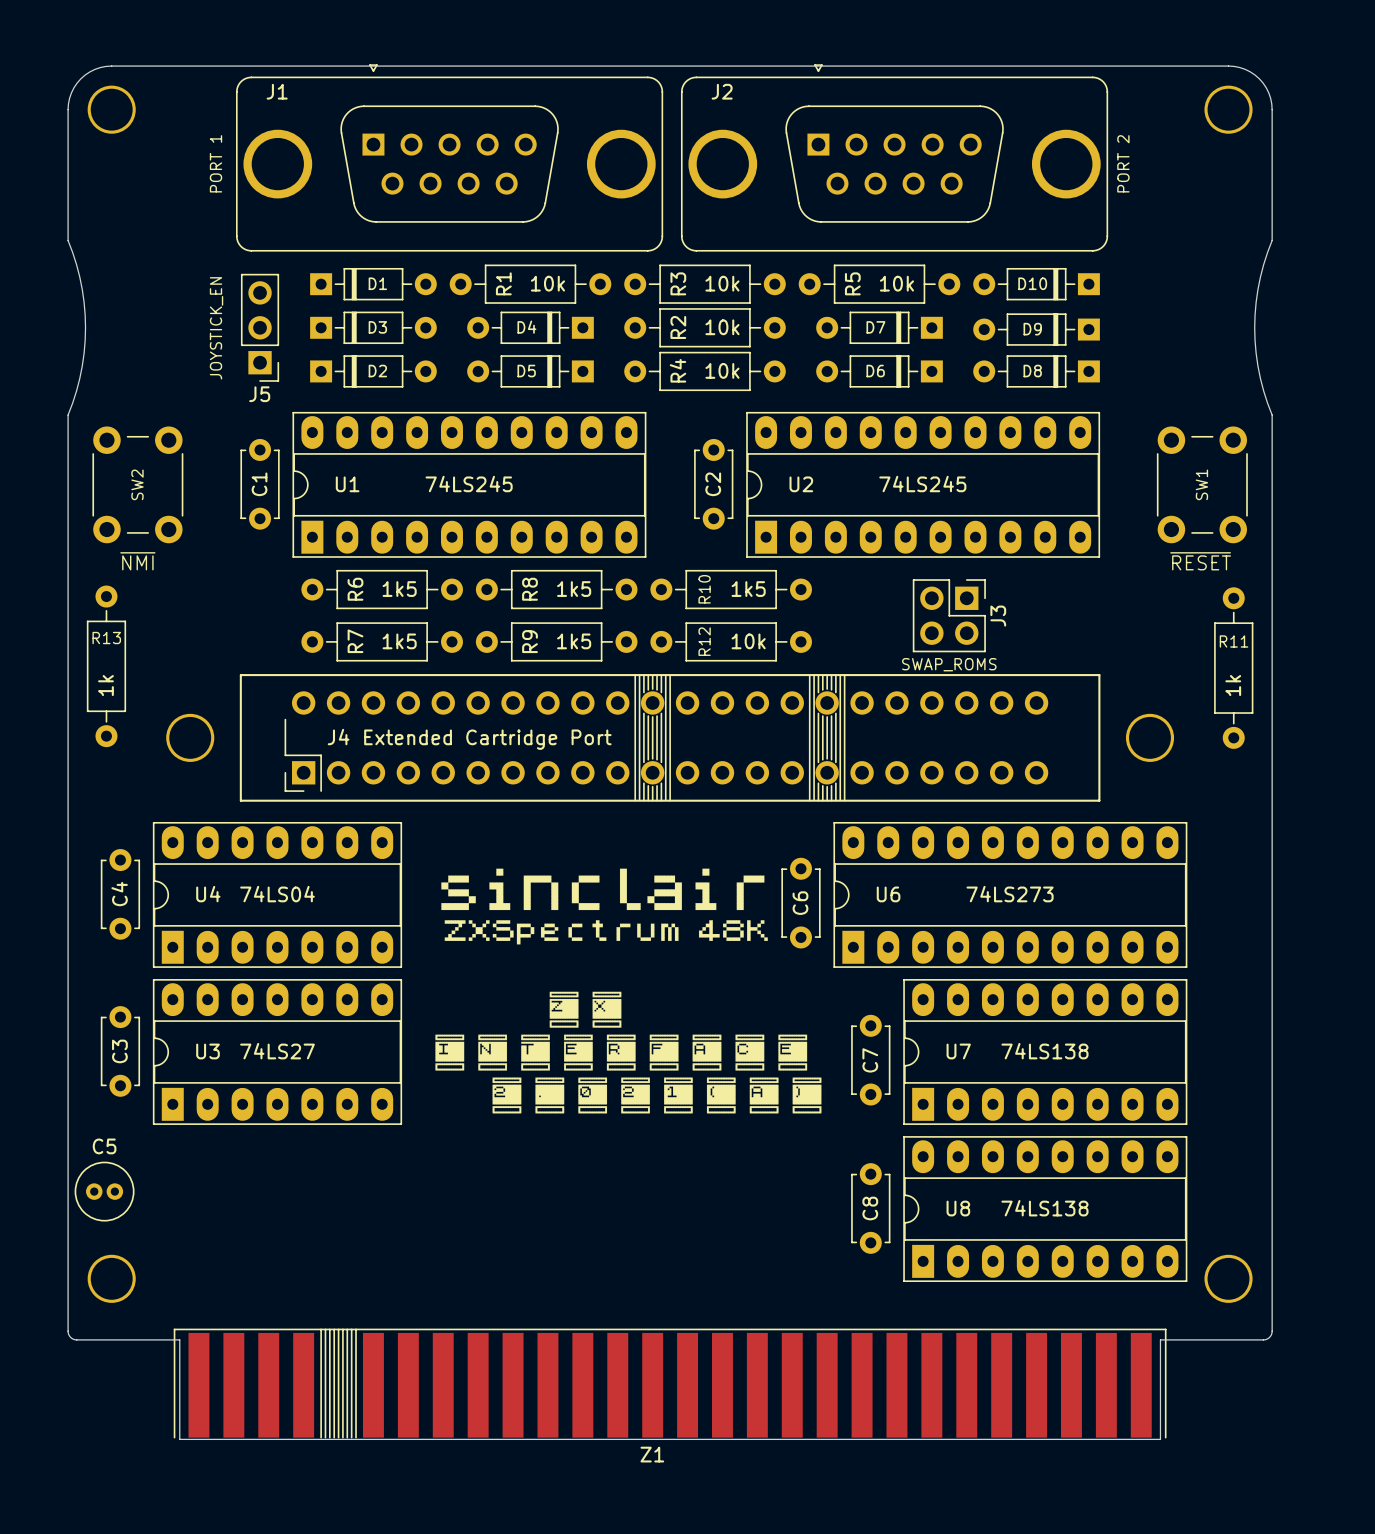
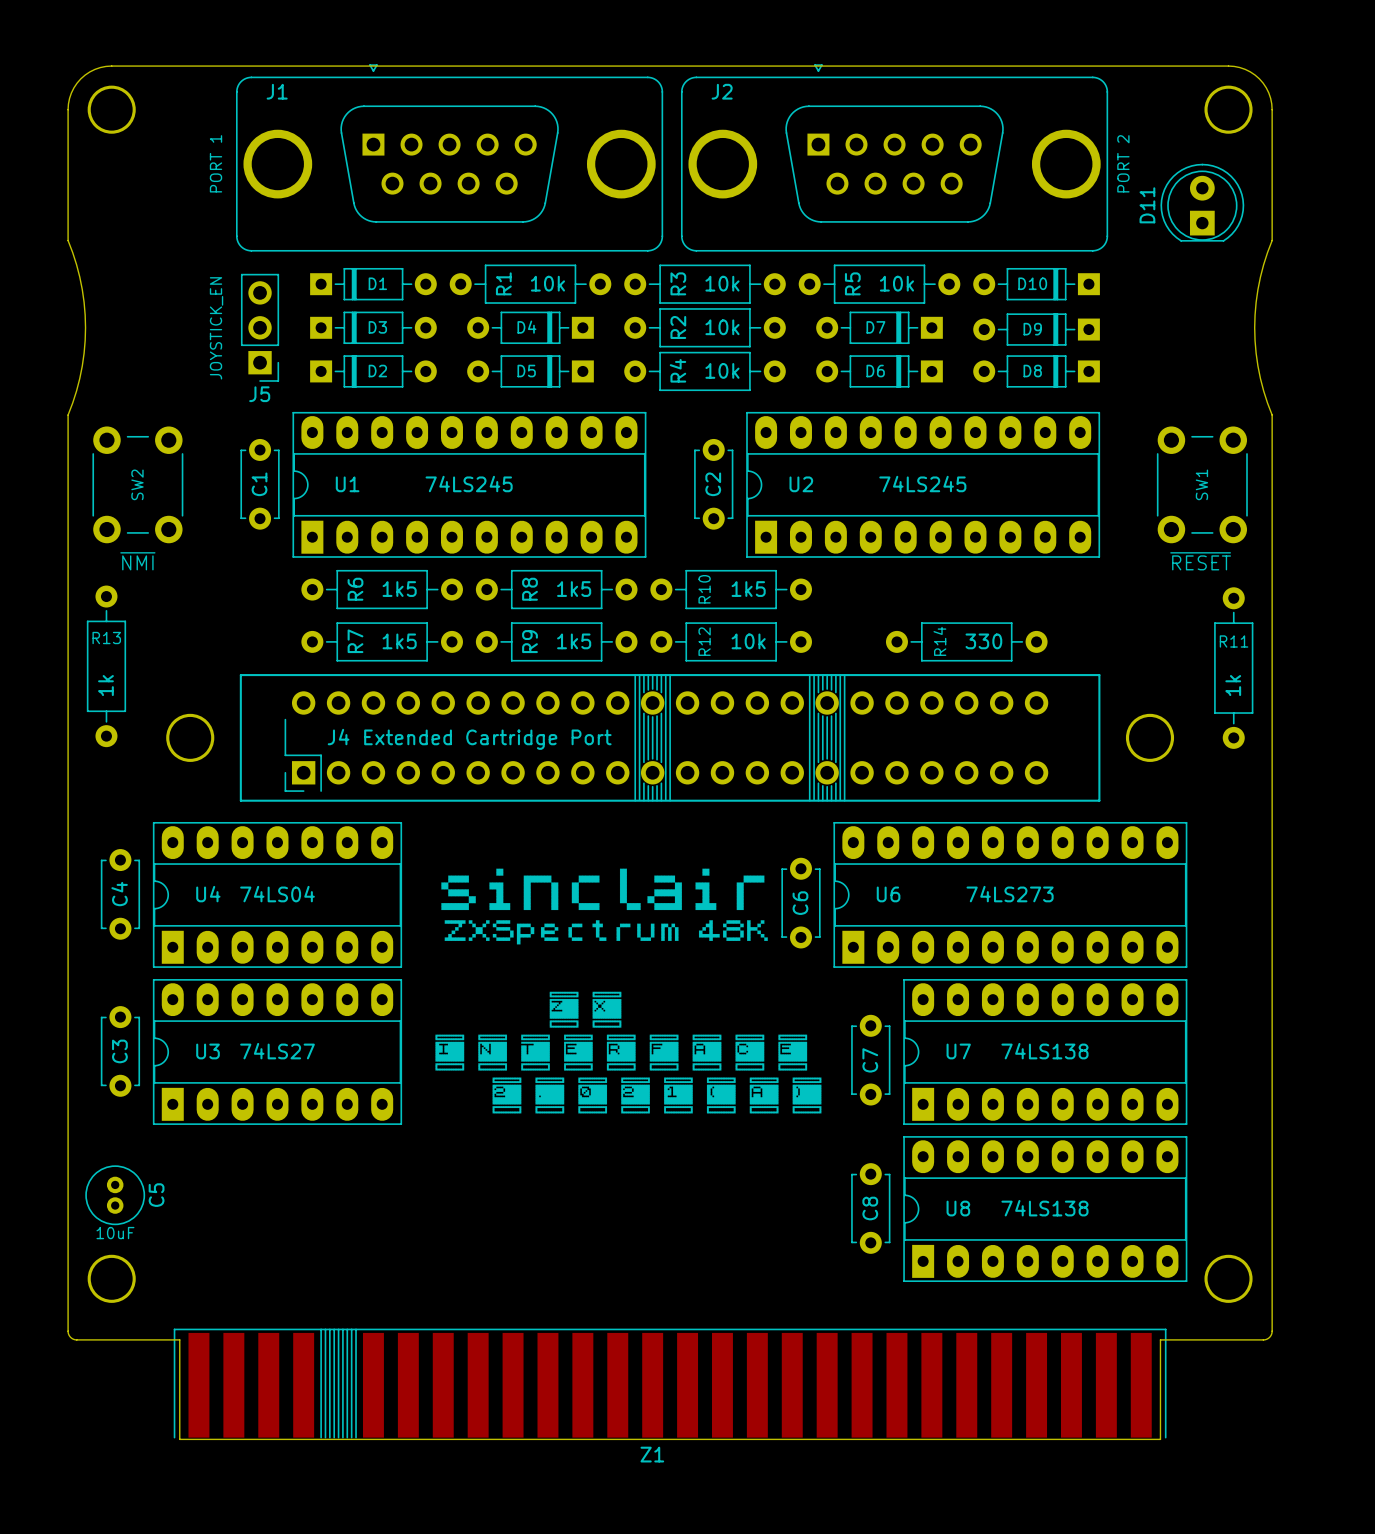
D11: none -> (1202, 202)
J3: SWAP_ROMS (949, 615) -> none
R14: none -> 330 (966, 641)
C5 rotation: 0° (104, 1191) -> 90° clockwise (115, 1195)
C5 value: none -> 10uF (115, 1233)

